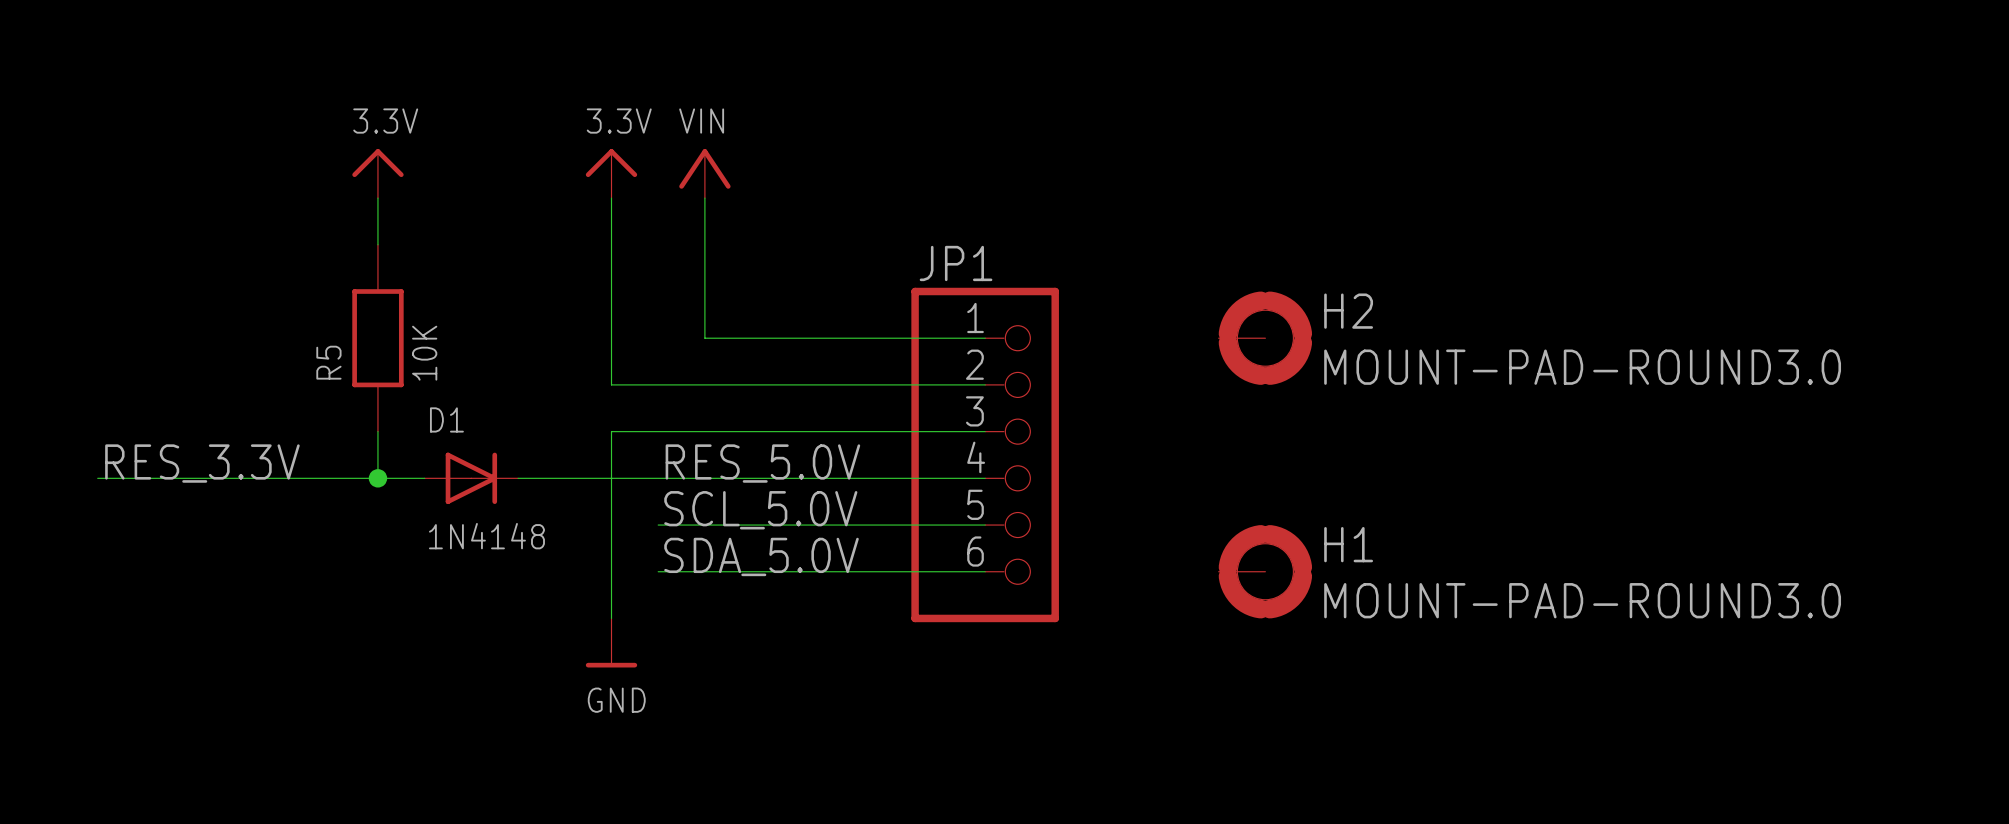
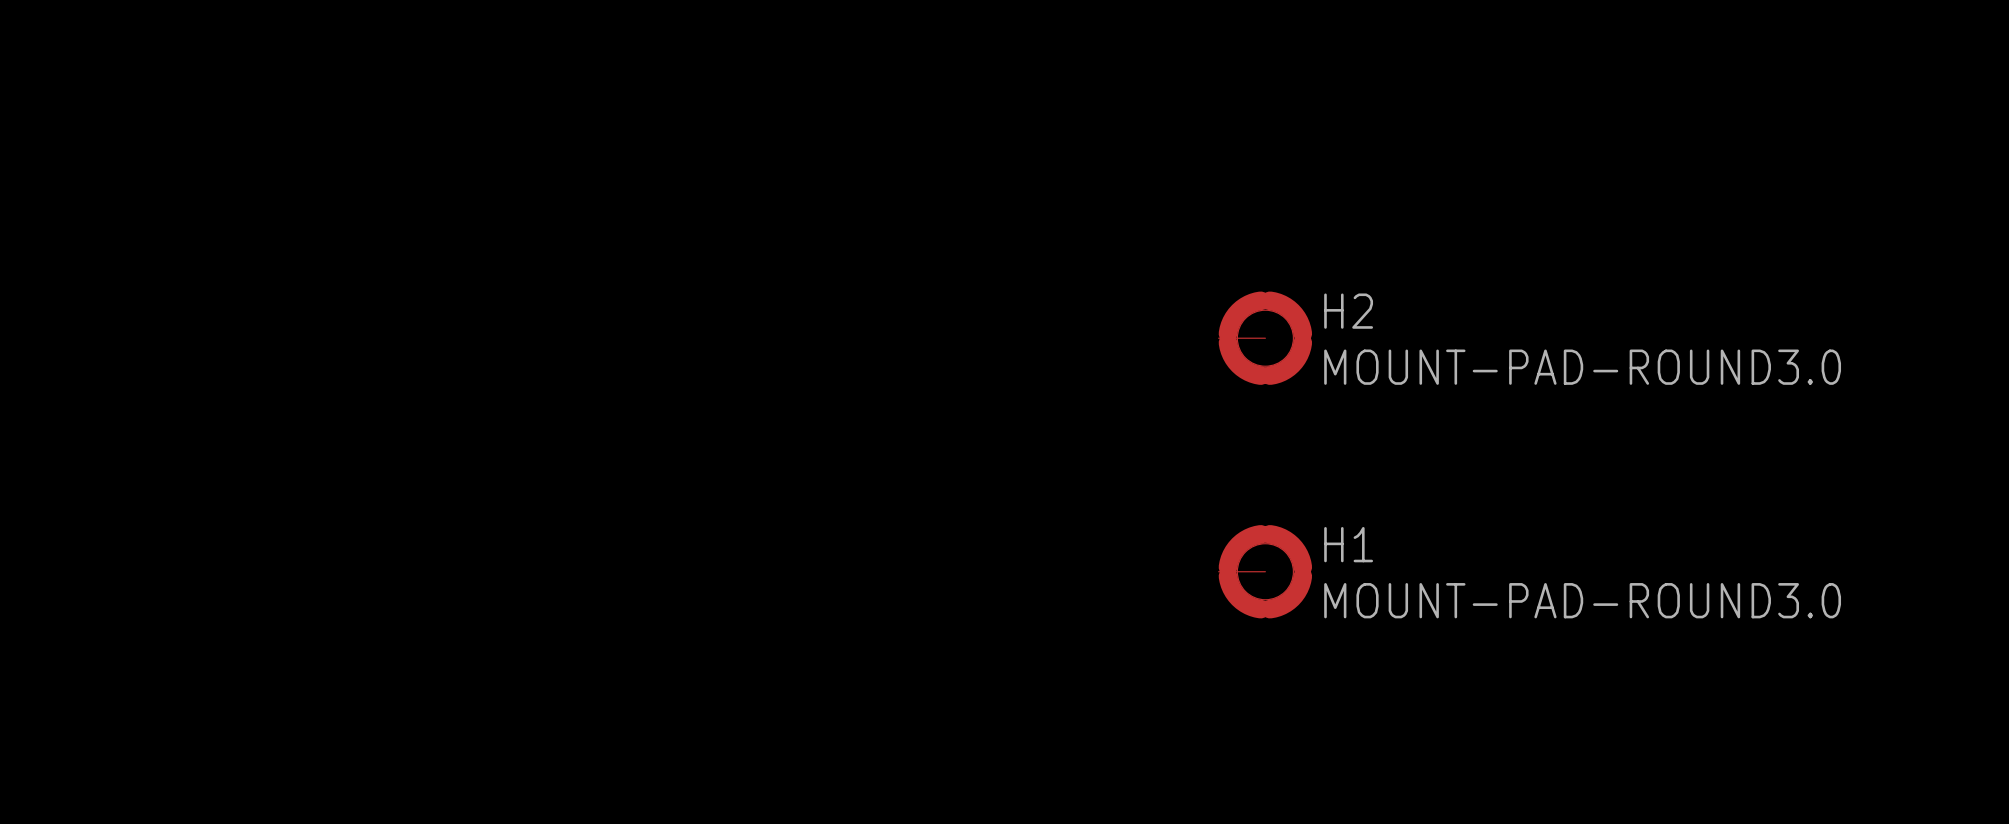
power symbol: 3.3V (377, 173) -> none
power symbol: 3.3V (611, 173) -> none
power symbol: VIN (704, 173) -> none
wire: (377, 198) (377, 244) -> none
wire: (611, 198) (611, 384) (985, 384) -> none
wire: (704, 198) (704, 338) (985, 338) -> none
R5: 10K (377, 338) -> none
wire: (377, 431) (377, 478) -> none
wire: (985, 431) (611, 431) (611, 618) -> none
JP1: (985, 454) -> none
label: RES_3.3V (202, 463) -> none
label: RES_5.0V (762, 463) -> none
wire: (97, 478) (424, 478) -> none
junction: (377, 478) -> none
D1: 1N4148 (471, 478) -> none
wire: (518, 478) (985, 478) -> none
label: SCL_5.0V (760, 510) -> none
wire: (658, 525) (985, 525) -> none
label: SDA_5.0V (761, 556) -> none
wire: (658, 571) (985, 571) -> none
power symbol: GND (611, 642) -> none

